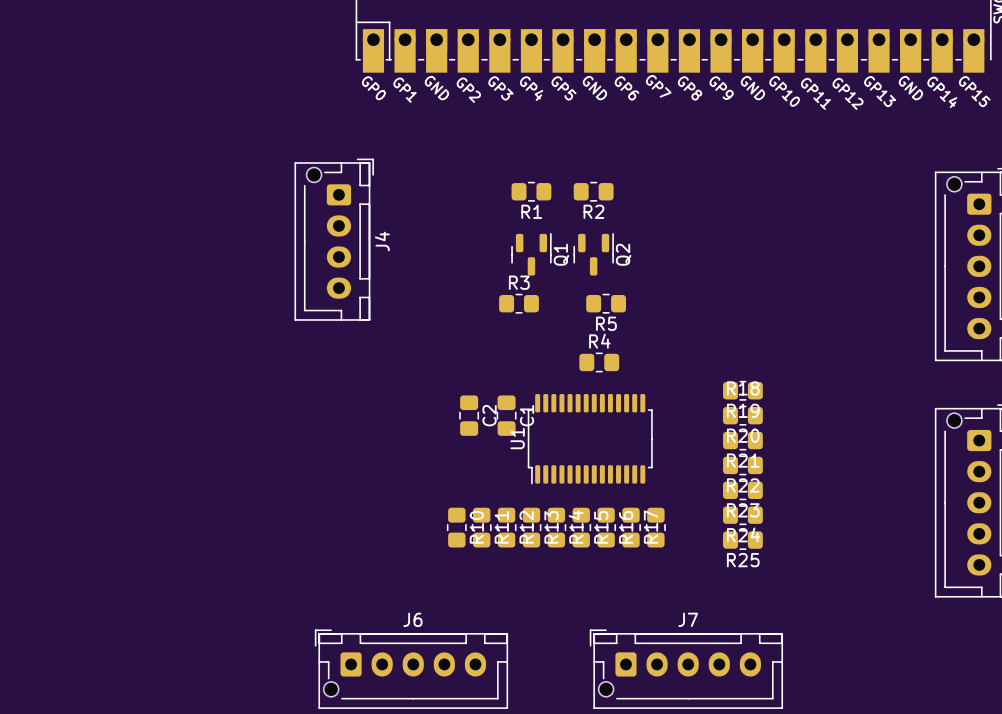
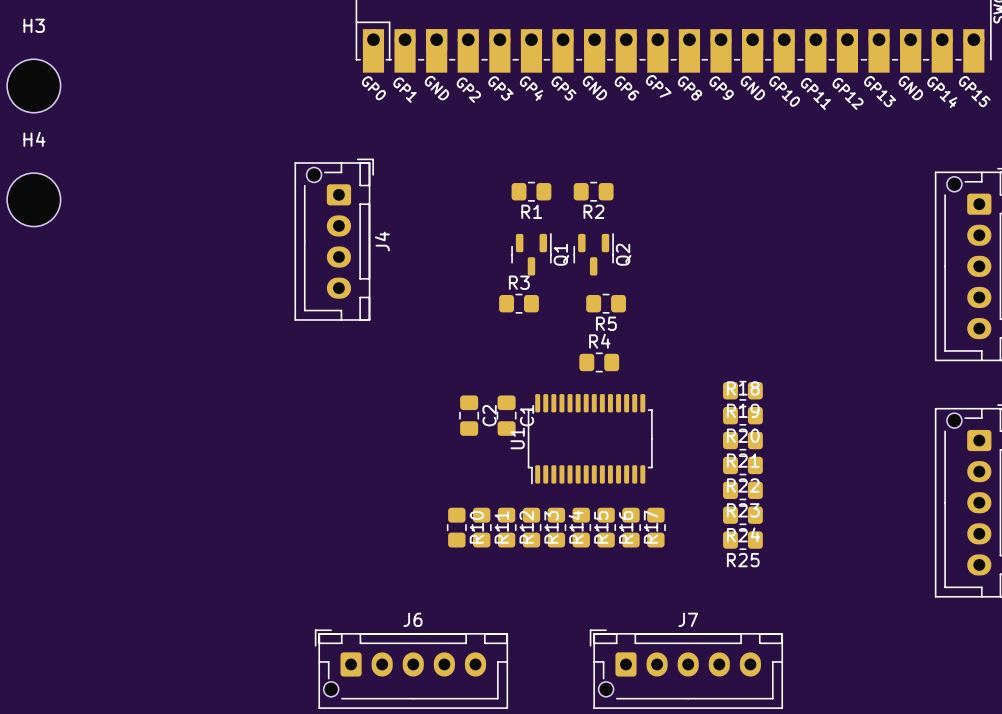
H3: none -> (33, 85)
H4: none -> (33, 199)

